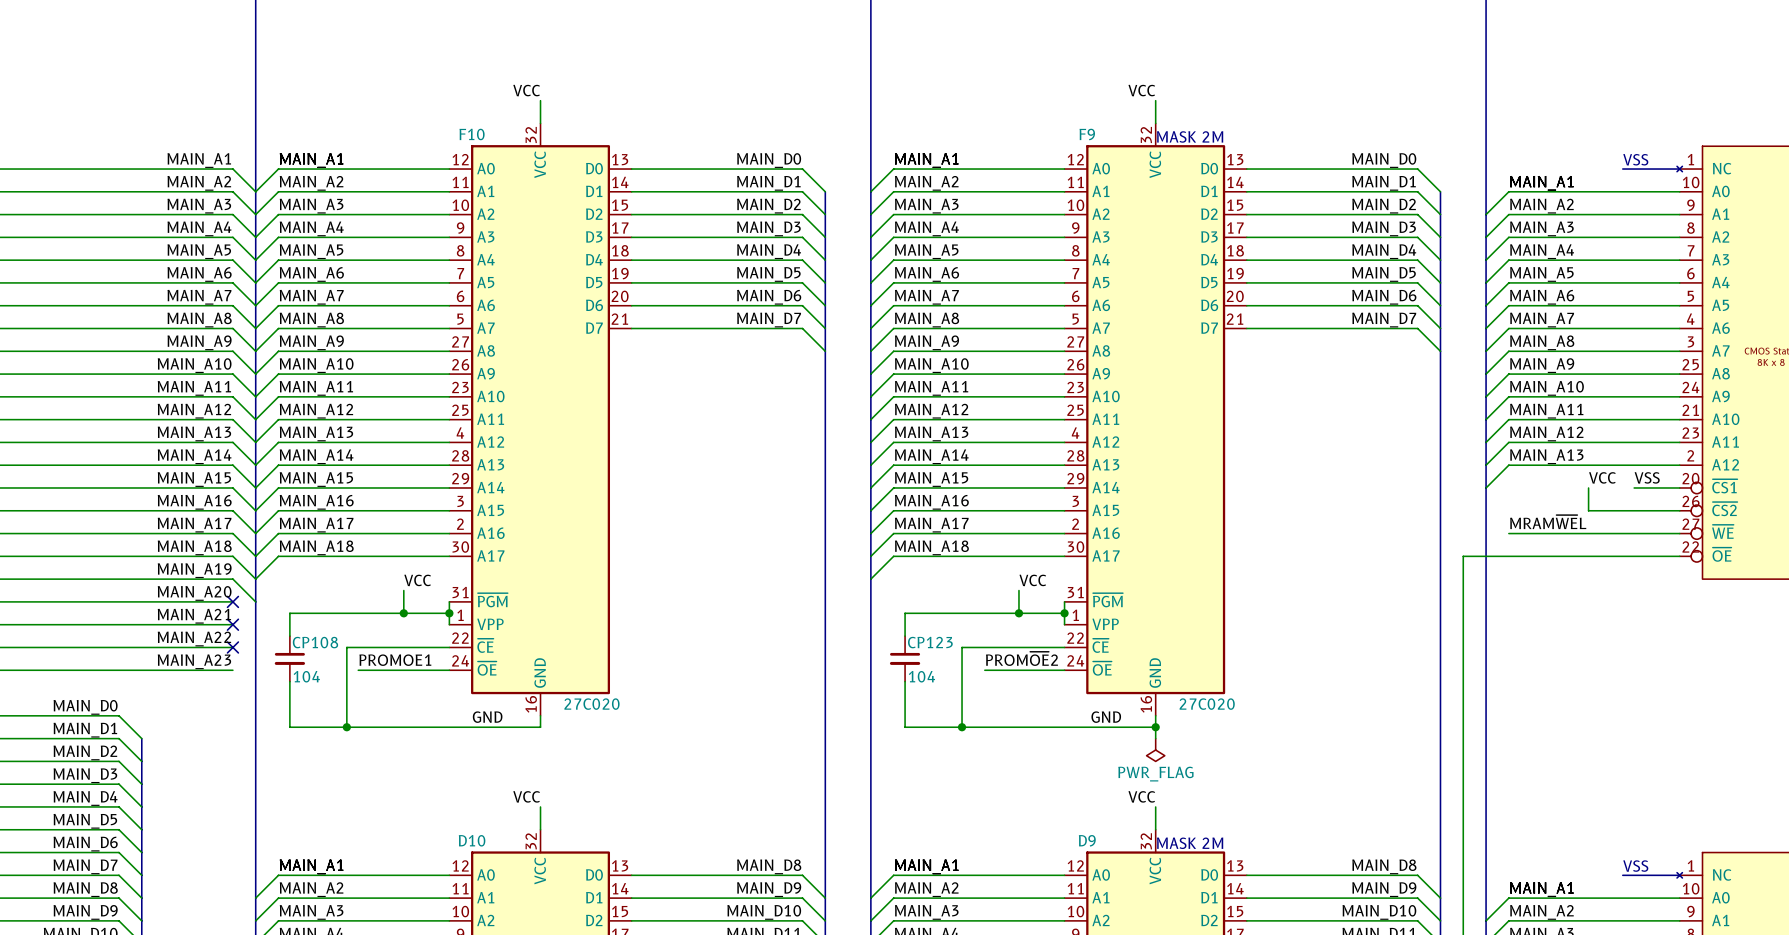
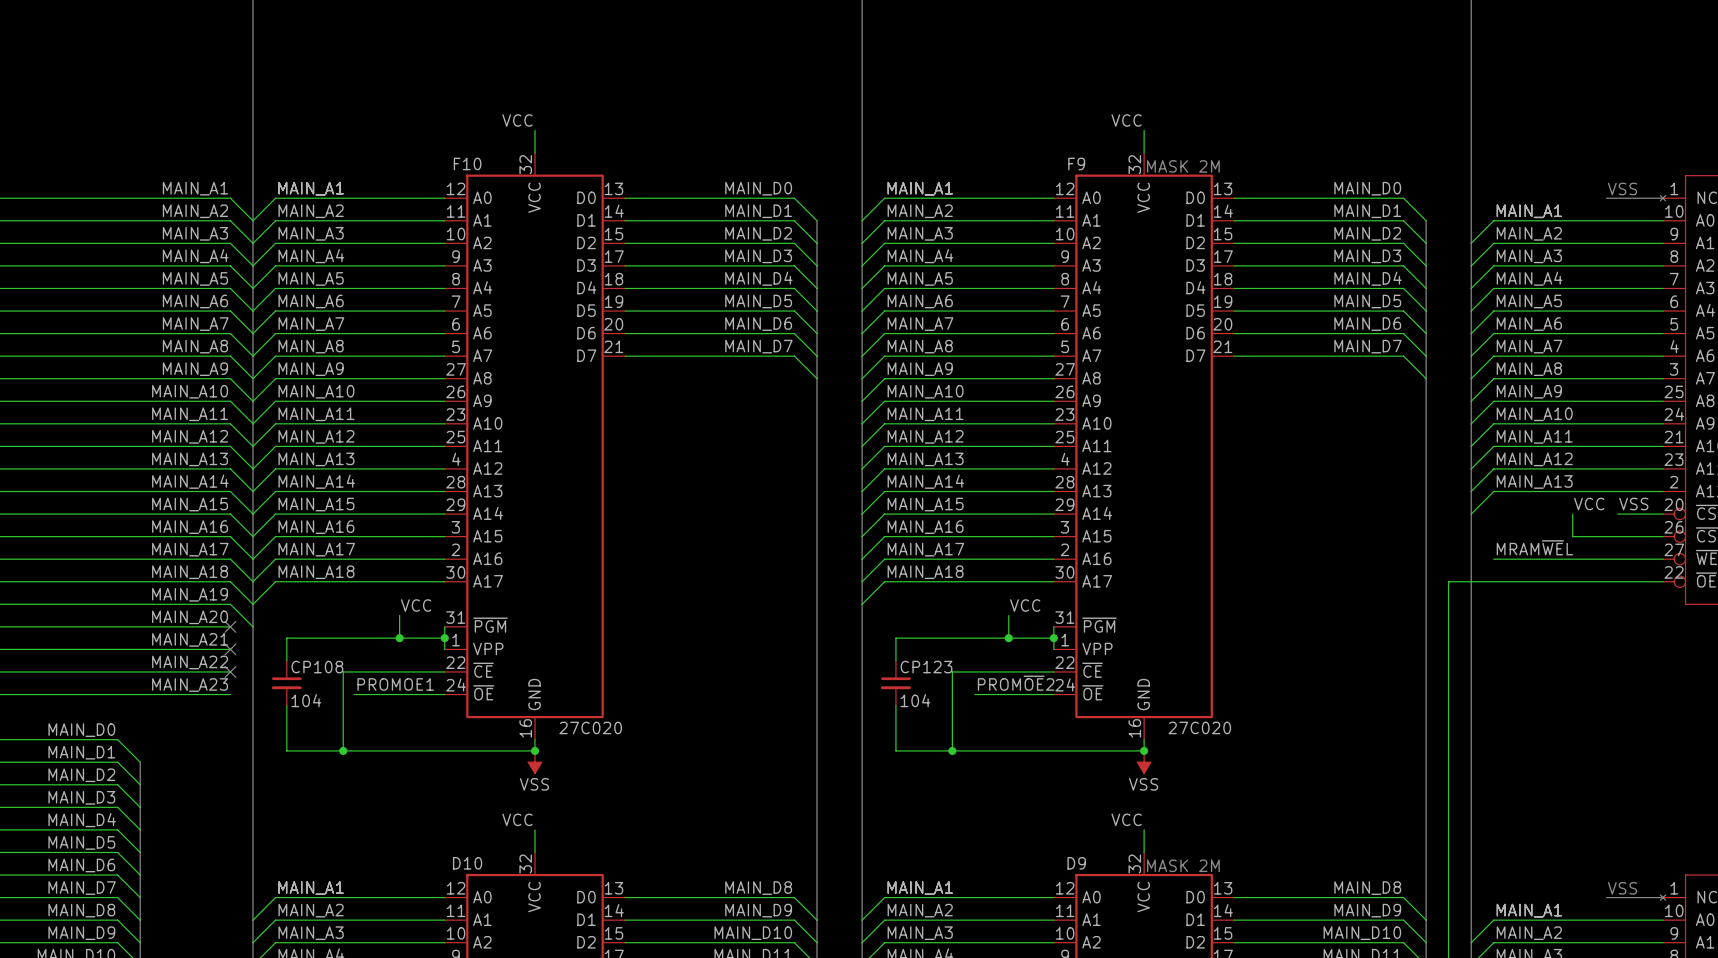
label: GND (487, 717) -> none
label: GND (1106, 717) -> none
junction: none -> (535, 750)
power symbol: none -> VSS (535, 762)
power symbol: none -> VSS (1144, 762)
power symbol: PWR_FLAG (1155, 750) -> none

